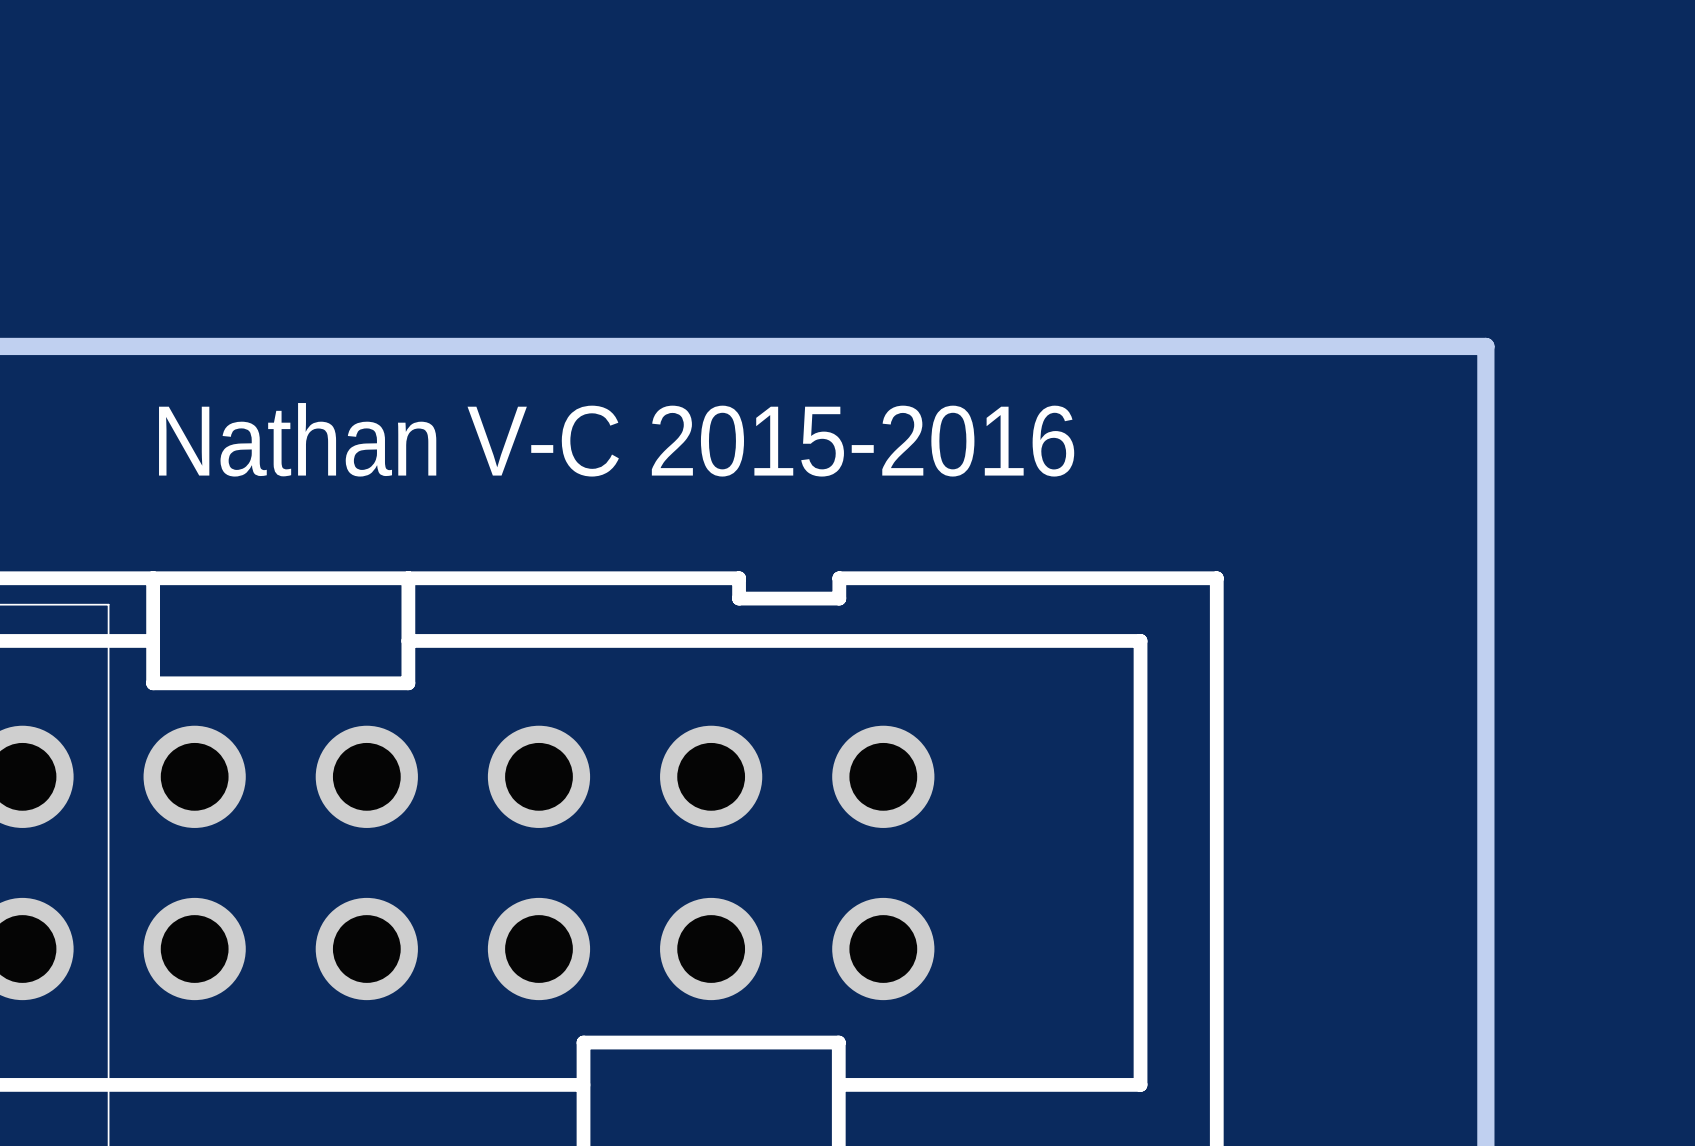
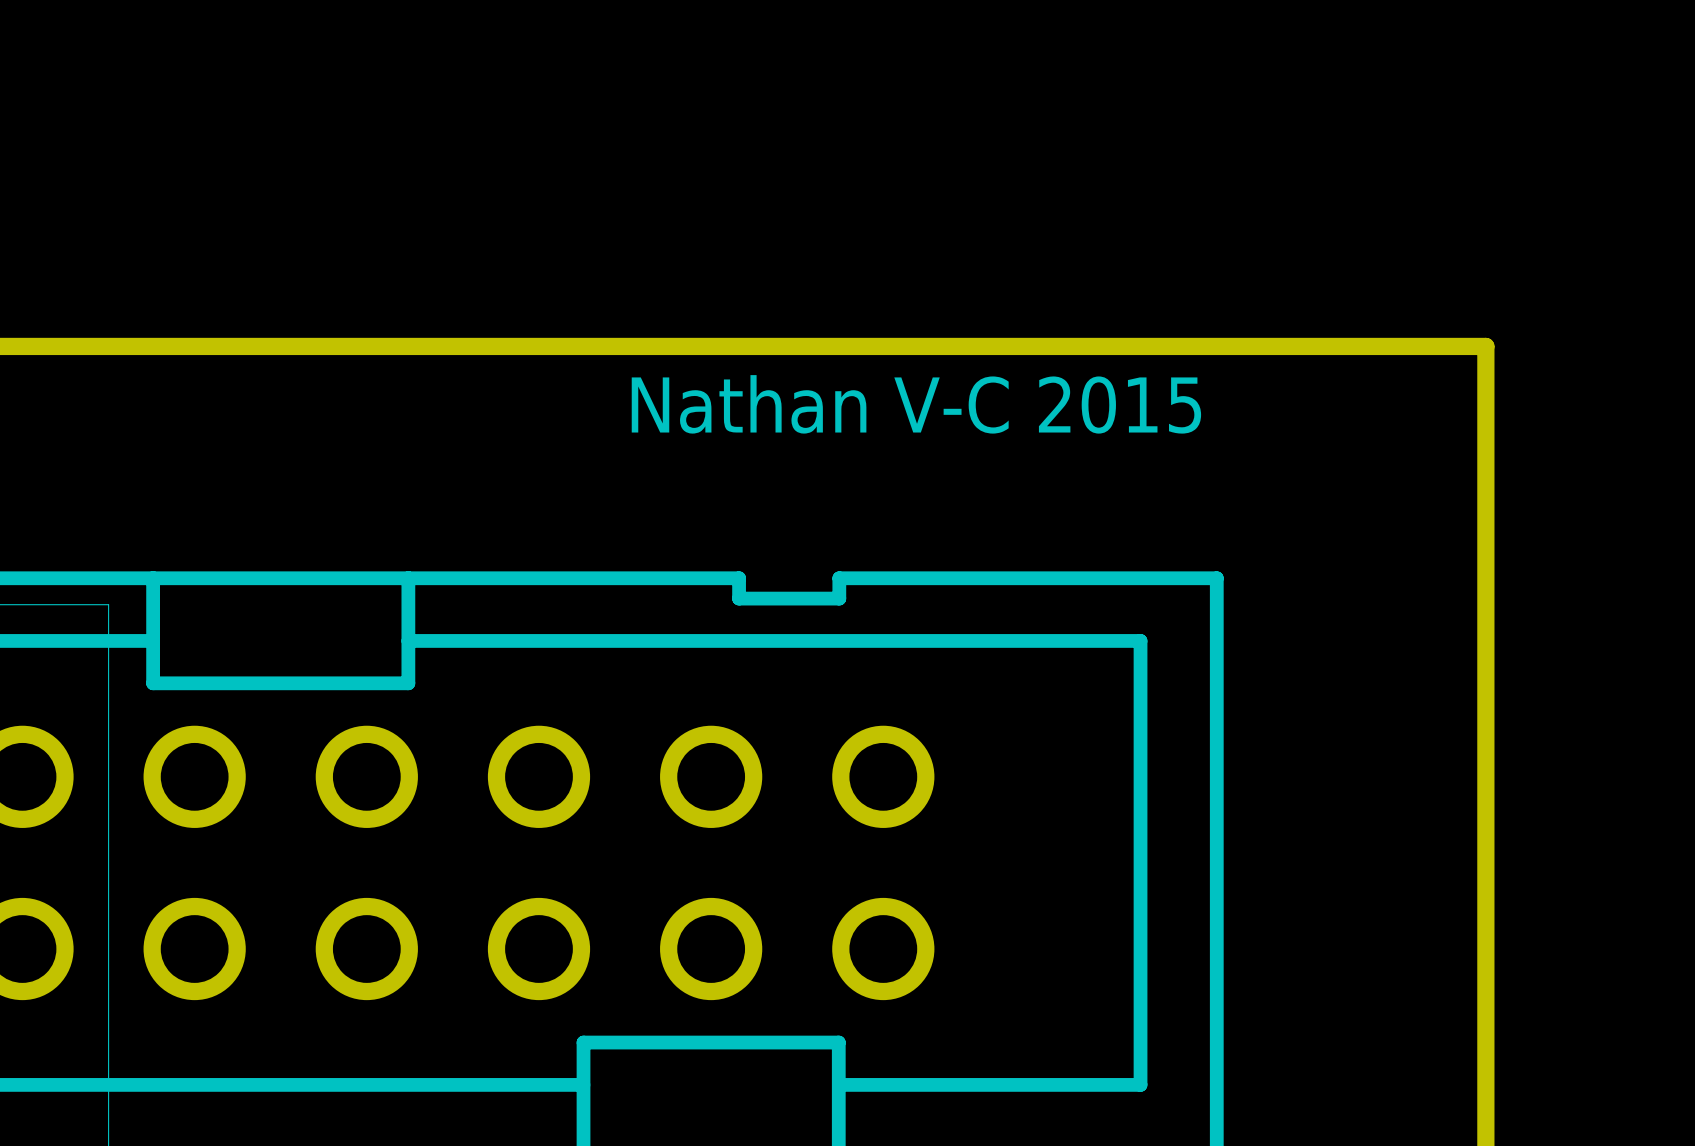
text: Nathan V-C 2015-2016 (616, 439) -> Nathan V-C 2015 (916, 404)

